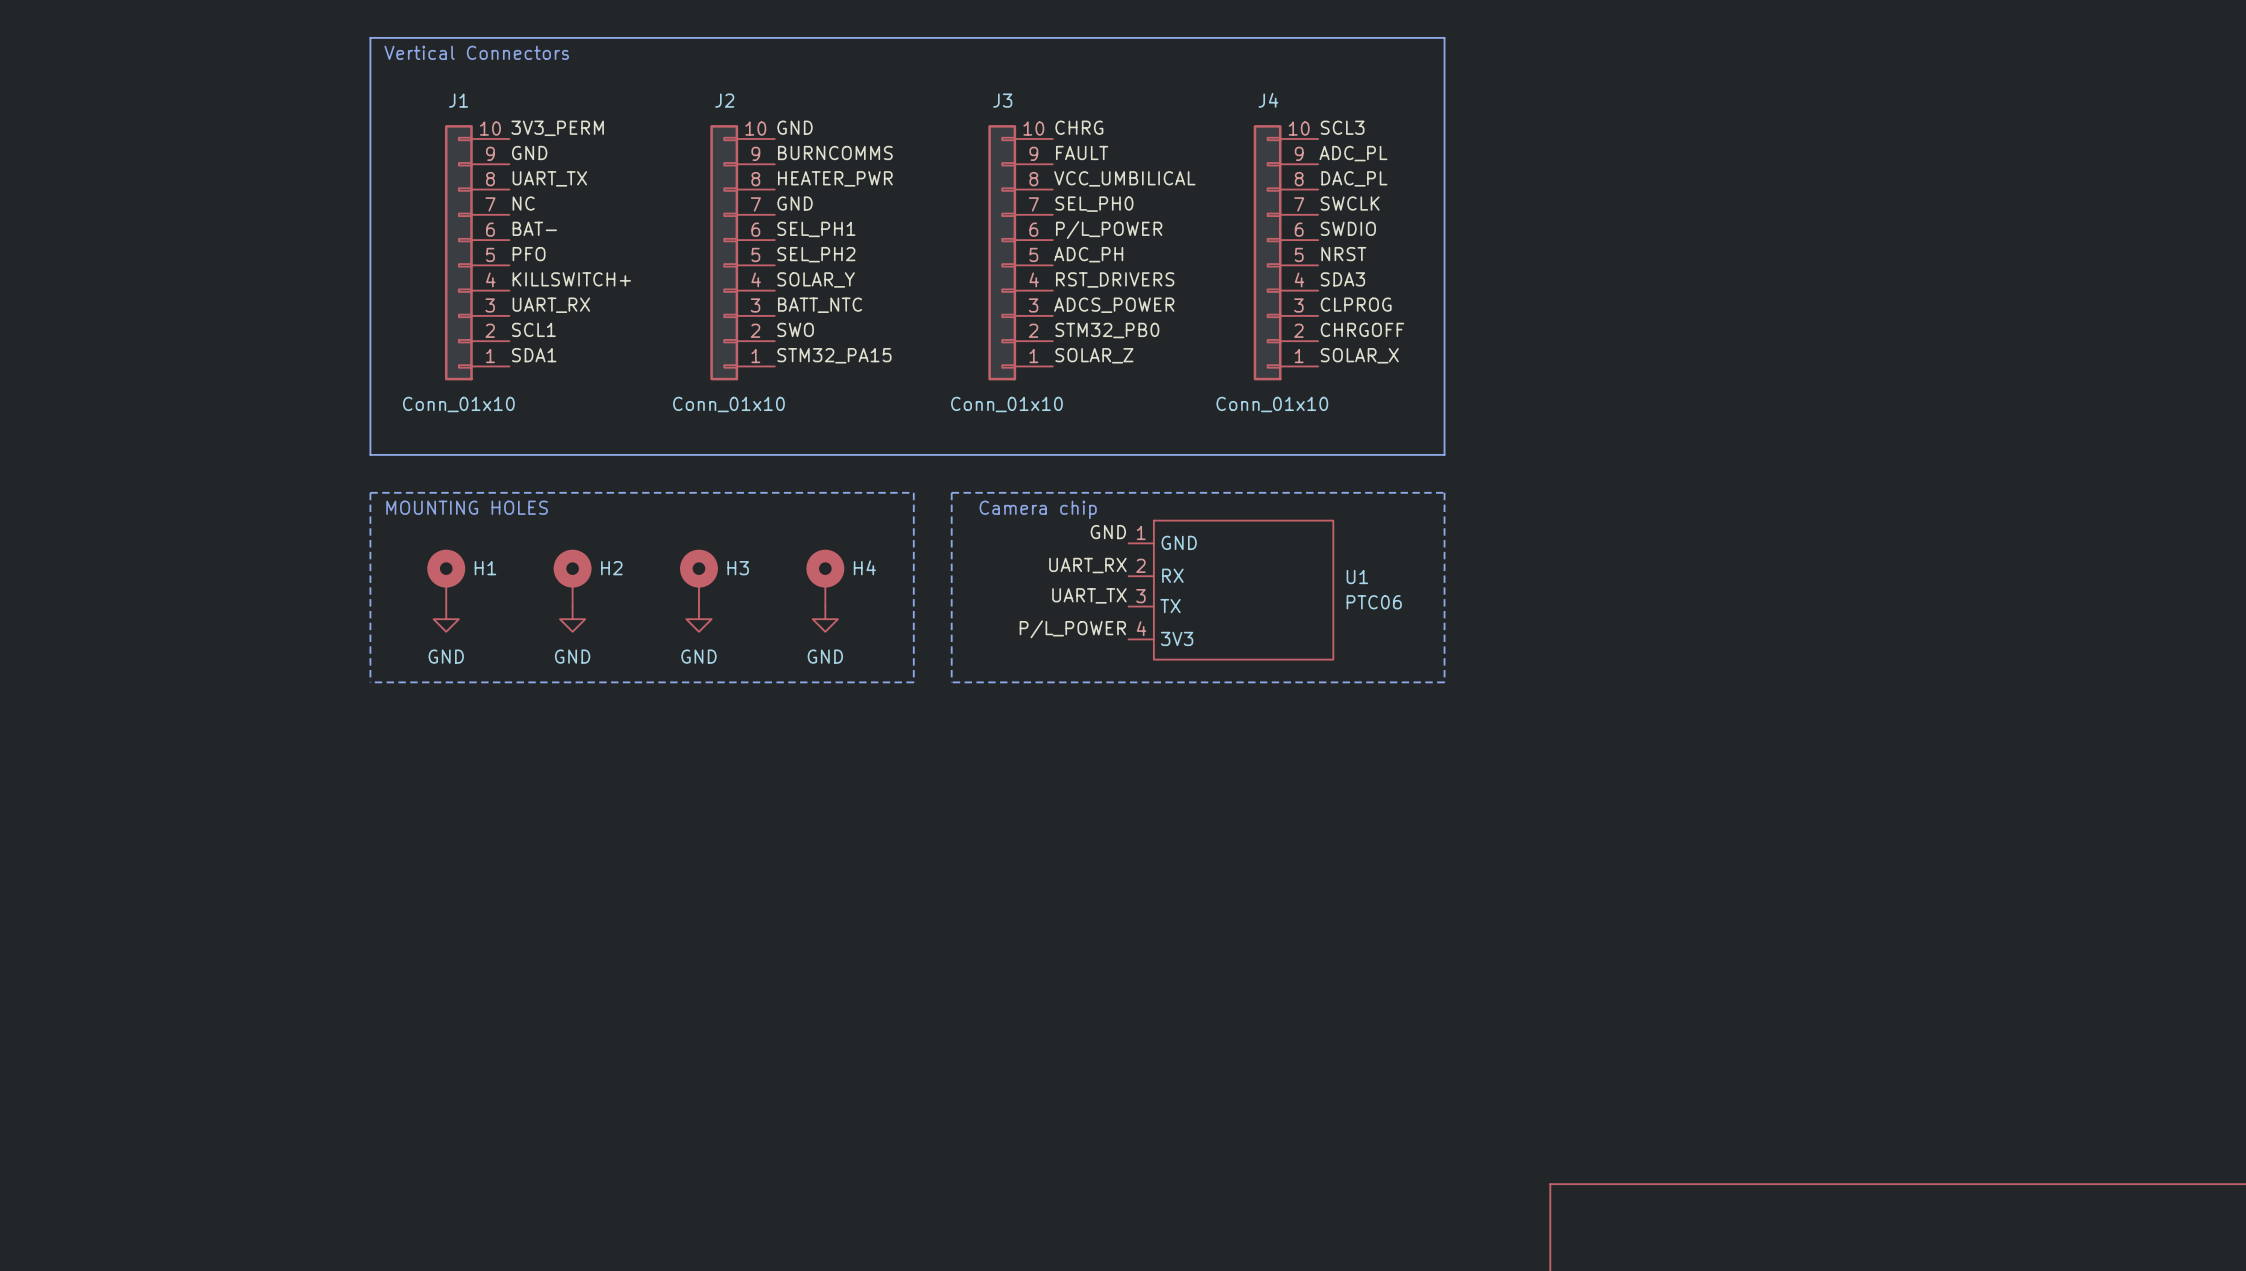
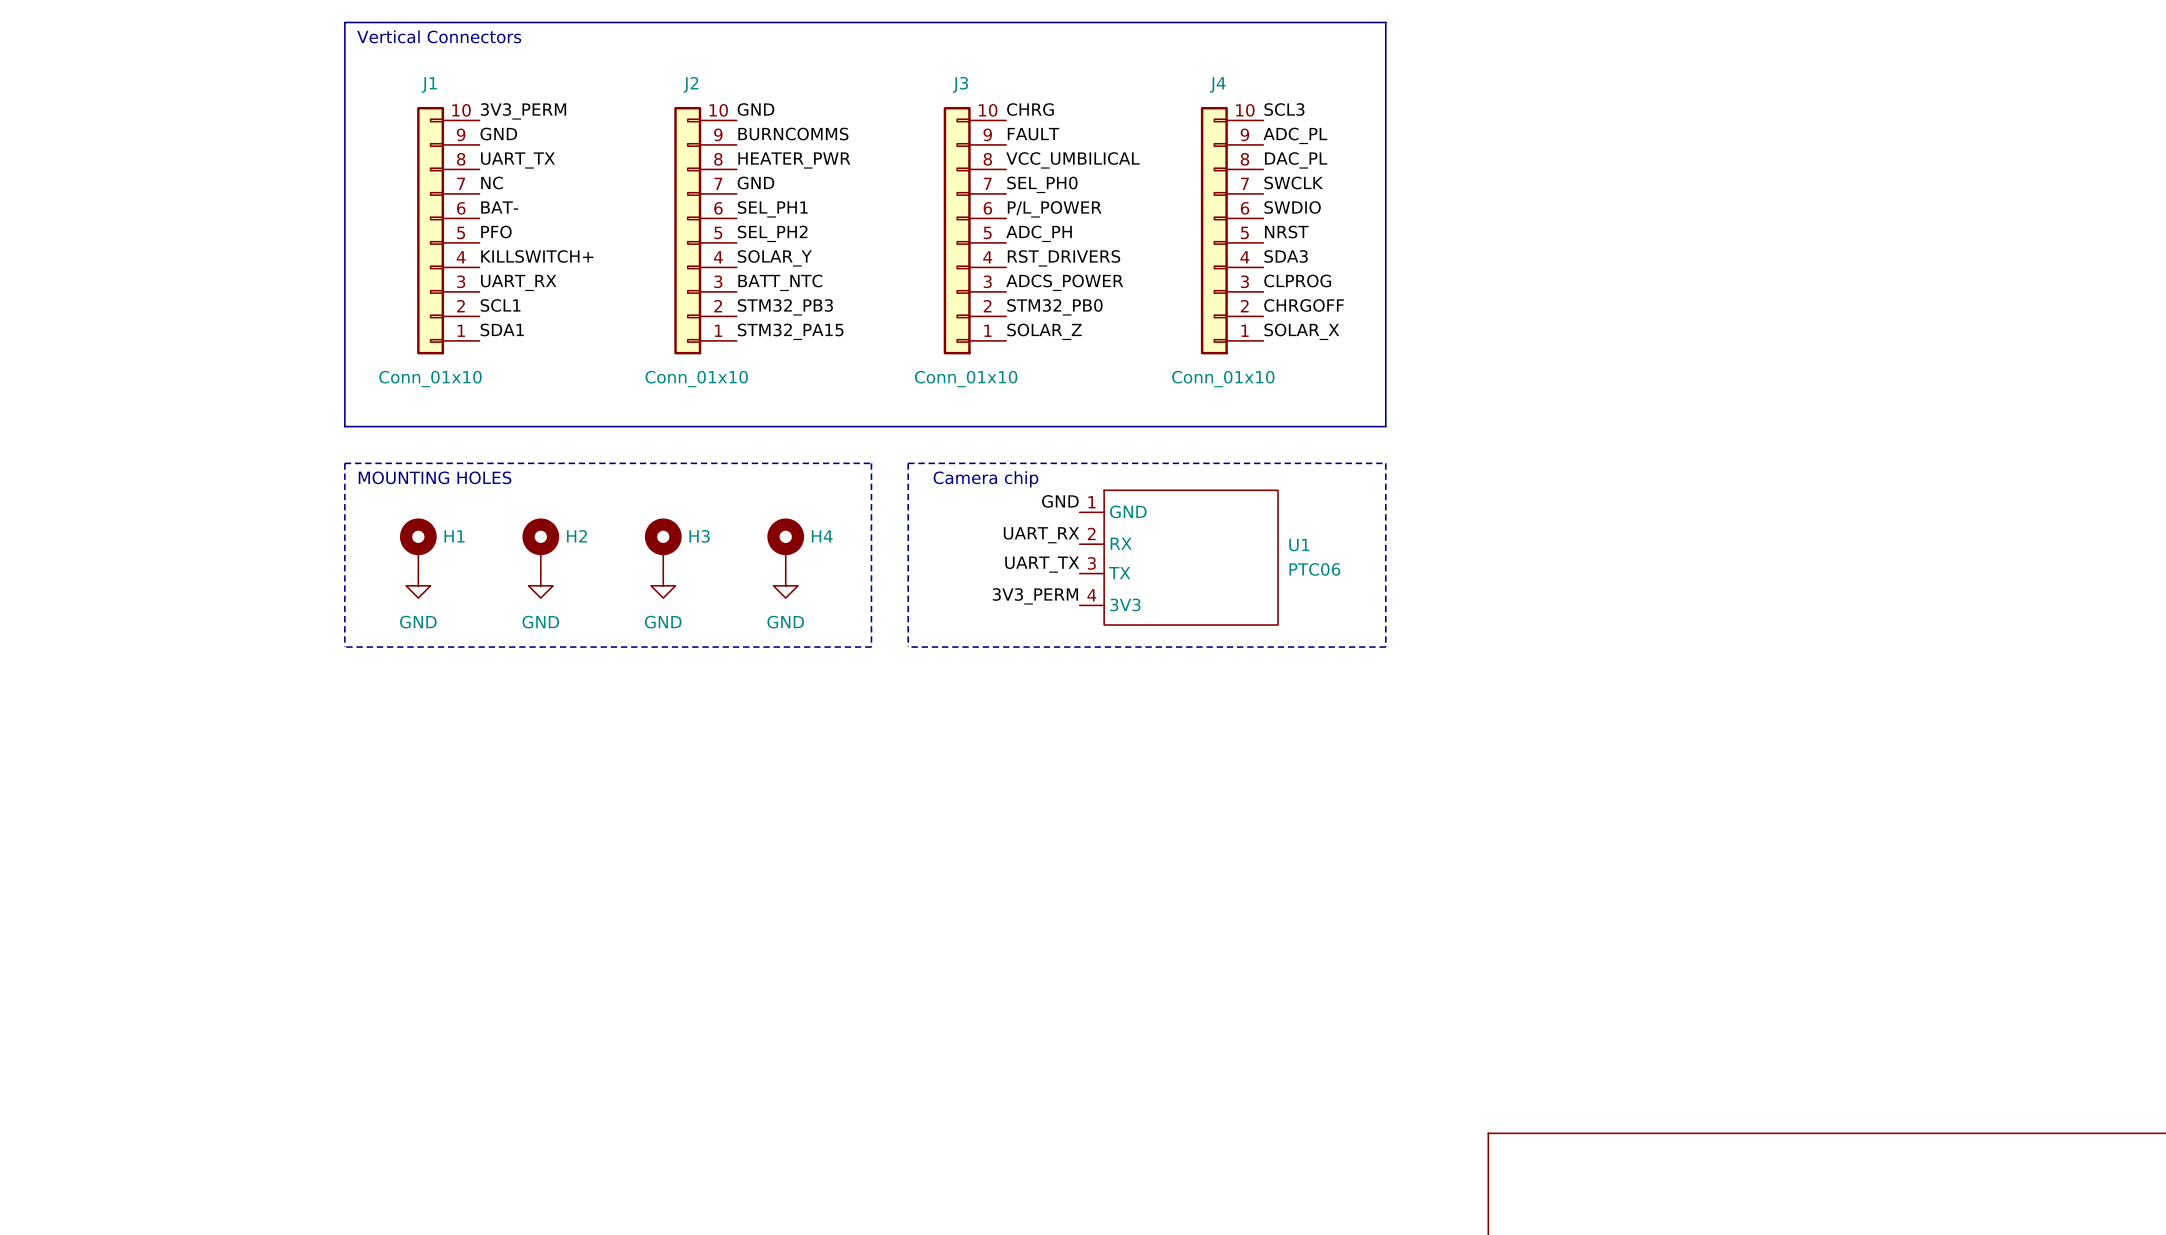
label: SWO (795, 329) -> STM32_PB3 (785, 307)
label: P/L_POWER (1072, 629) -> 3V3_PERM (1035, 596)

